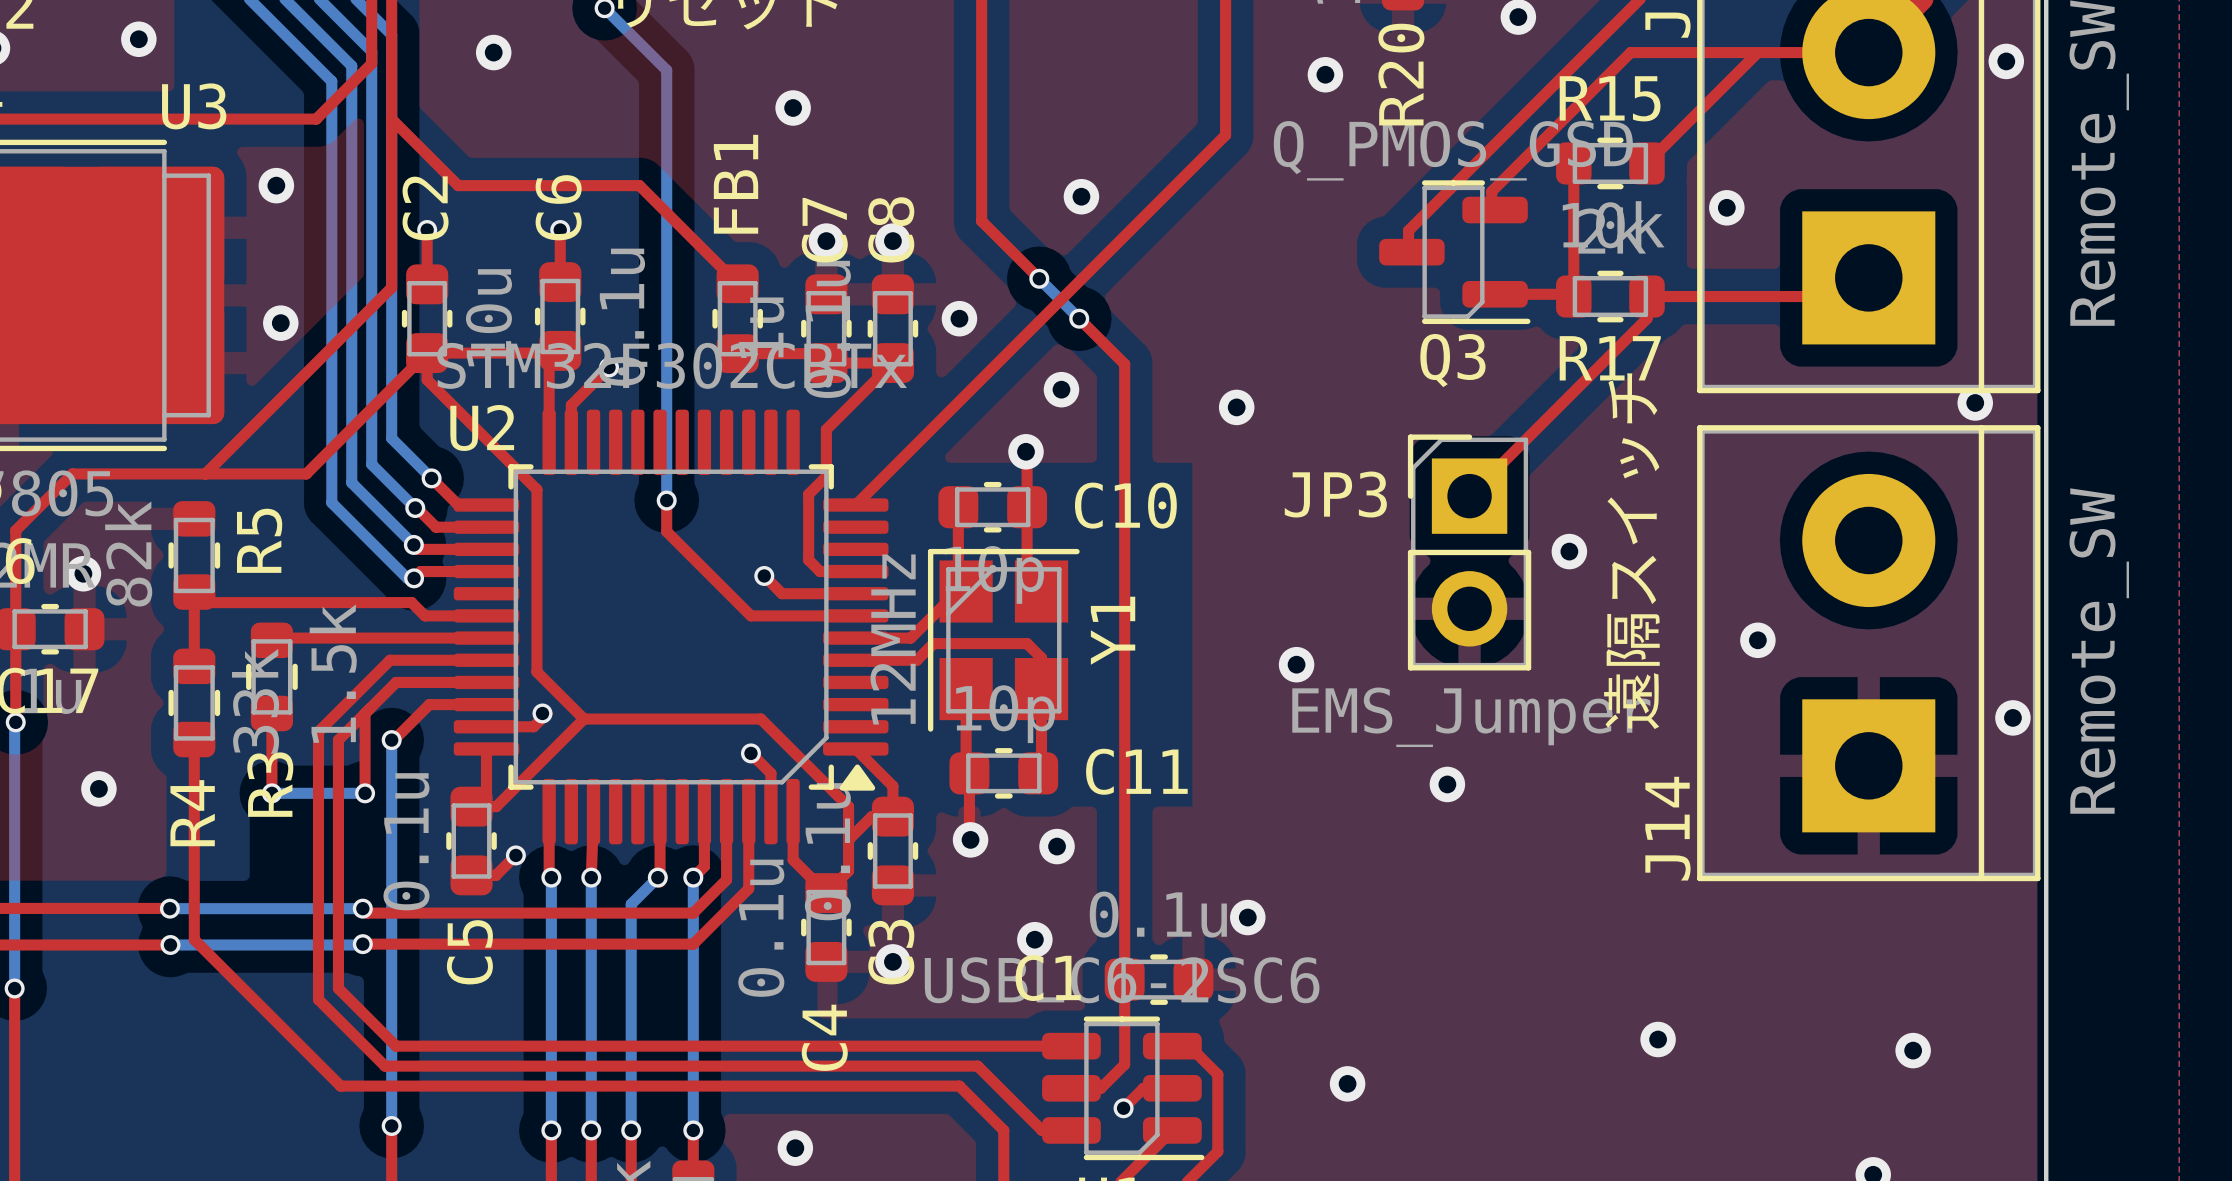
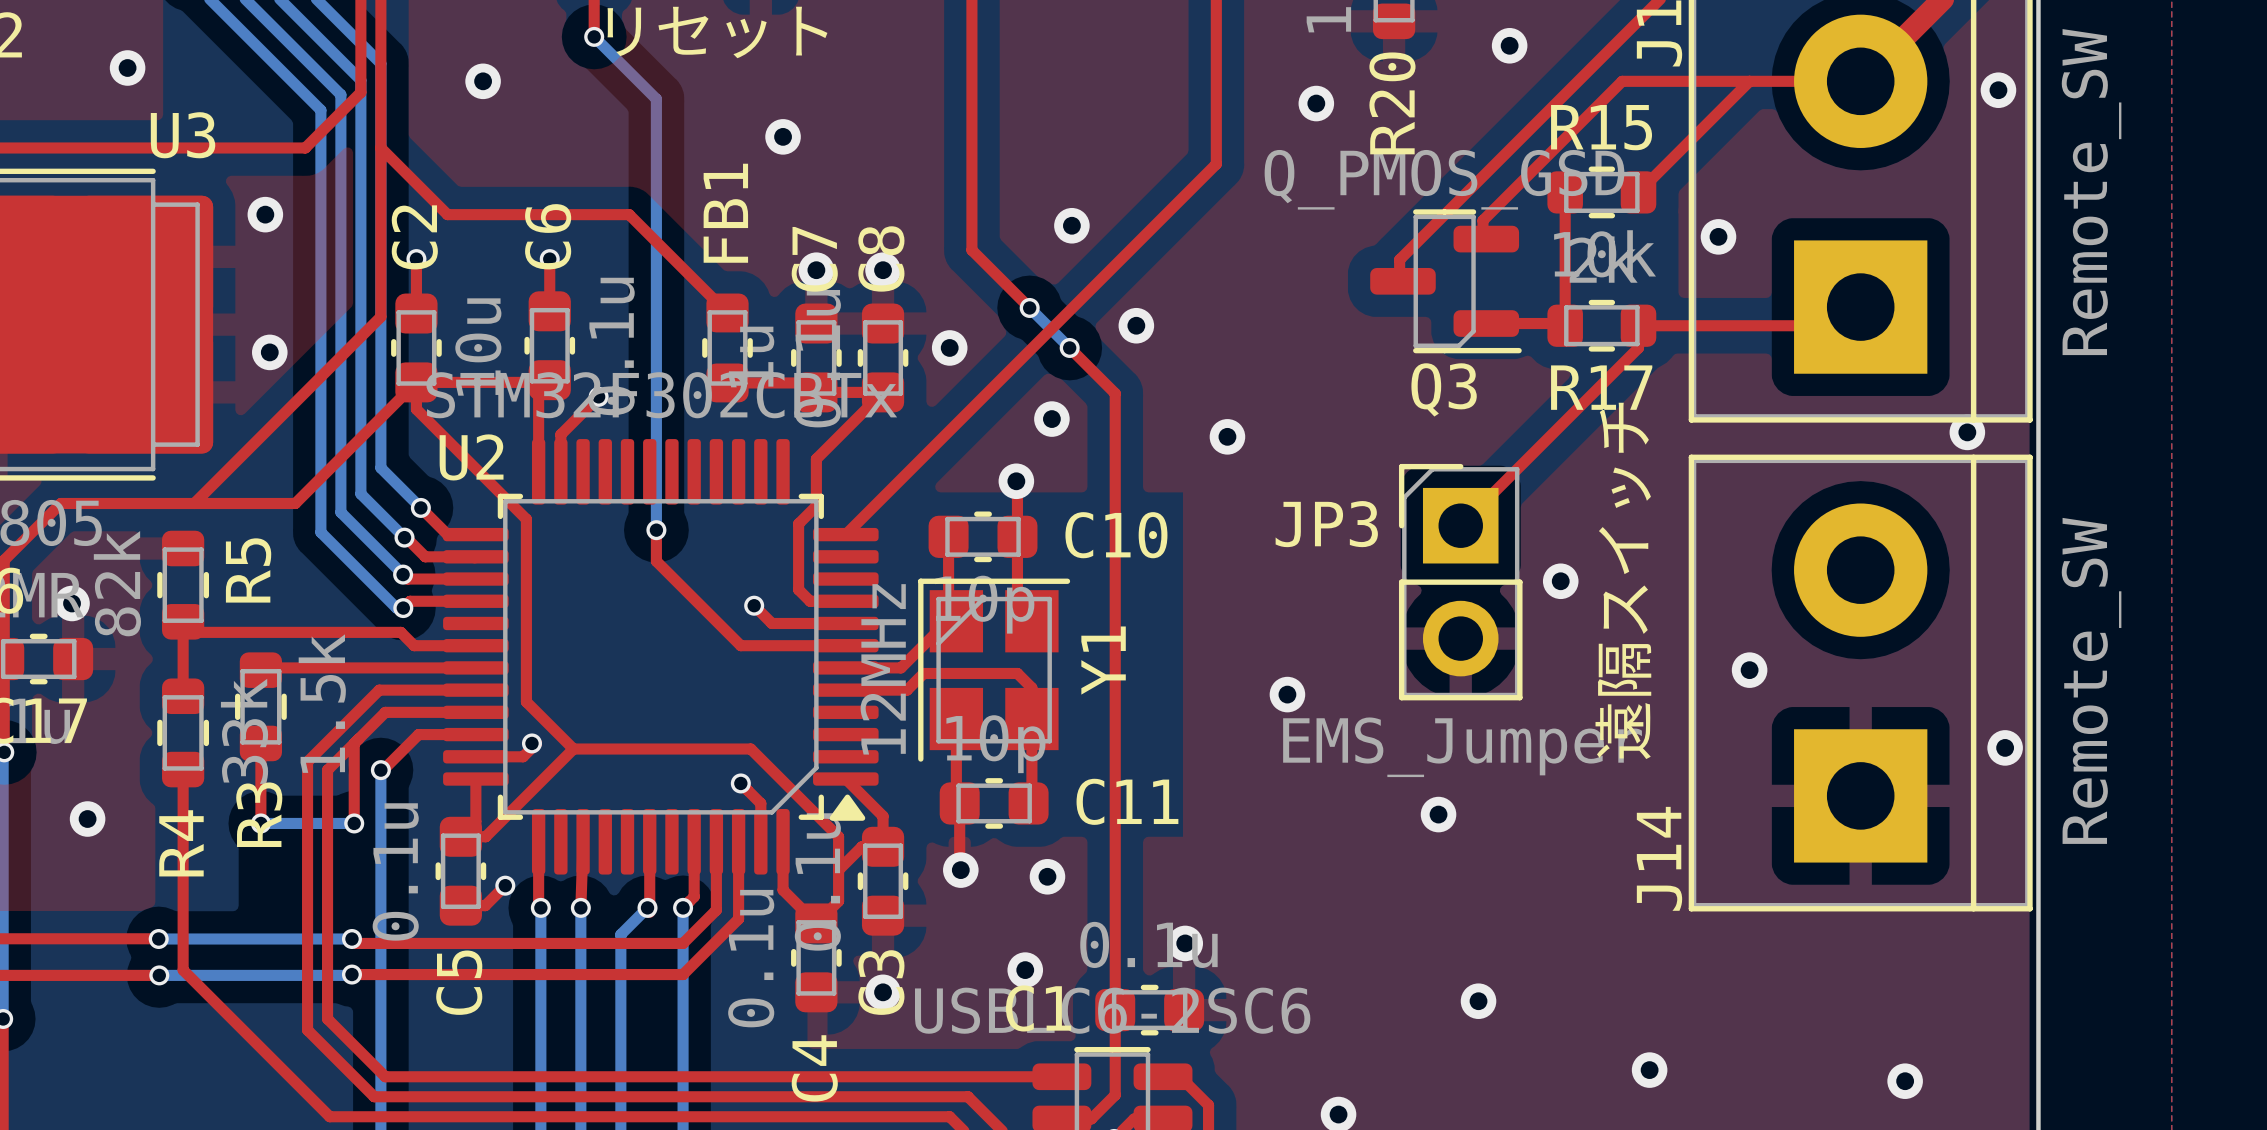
via: none -> (1136, 325)
via position: (1247, 917) -> (1185, 943)
via: none -> (1478, 1001)

